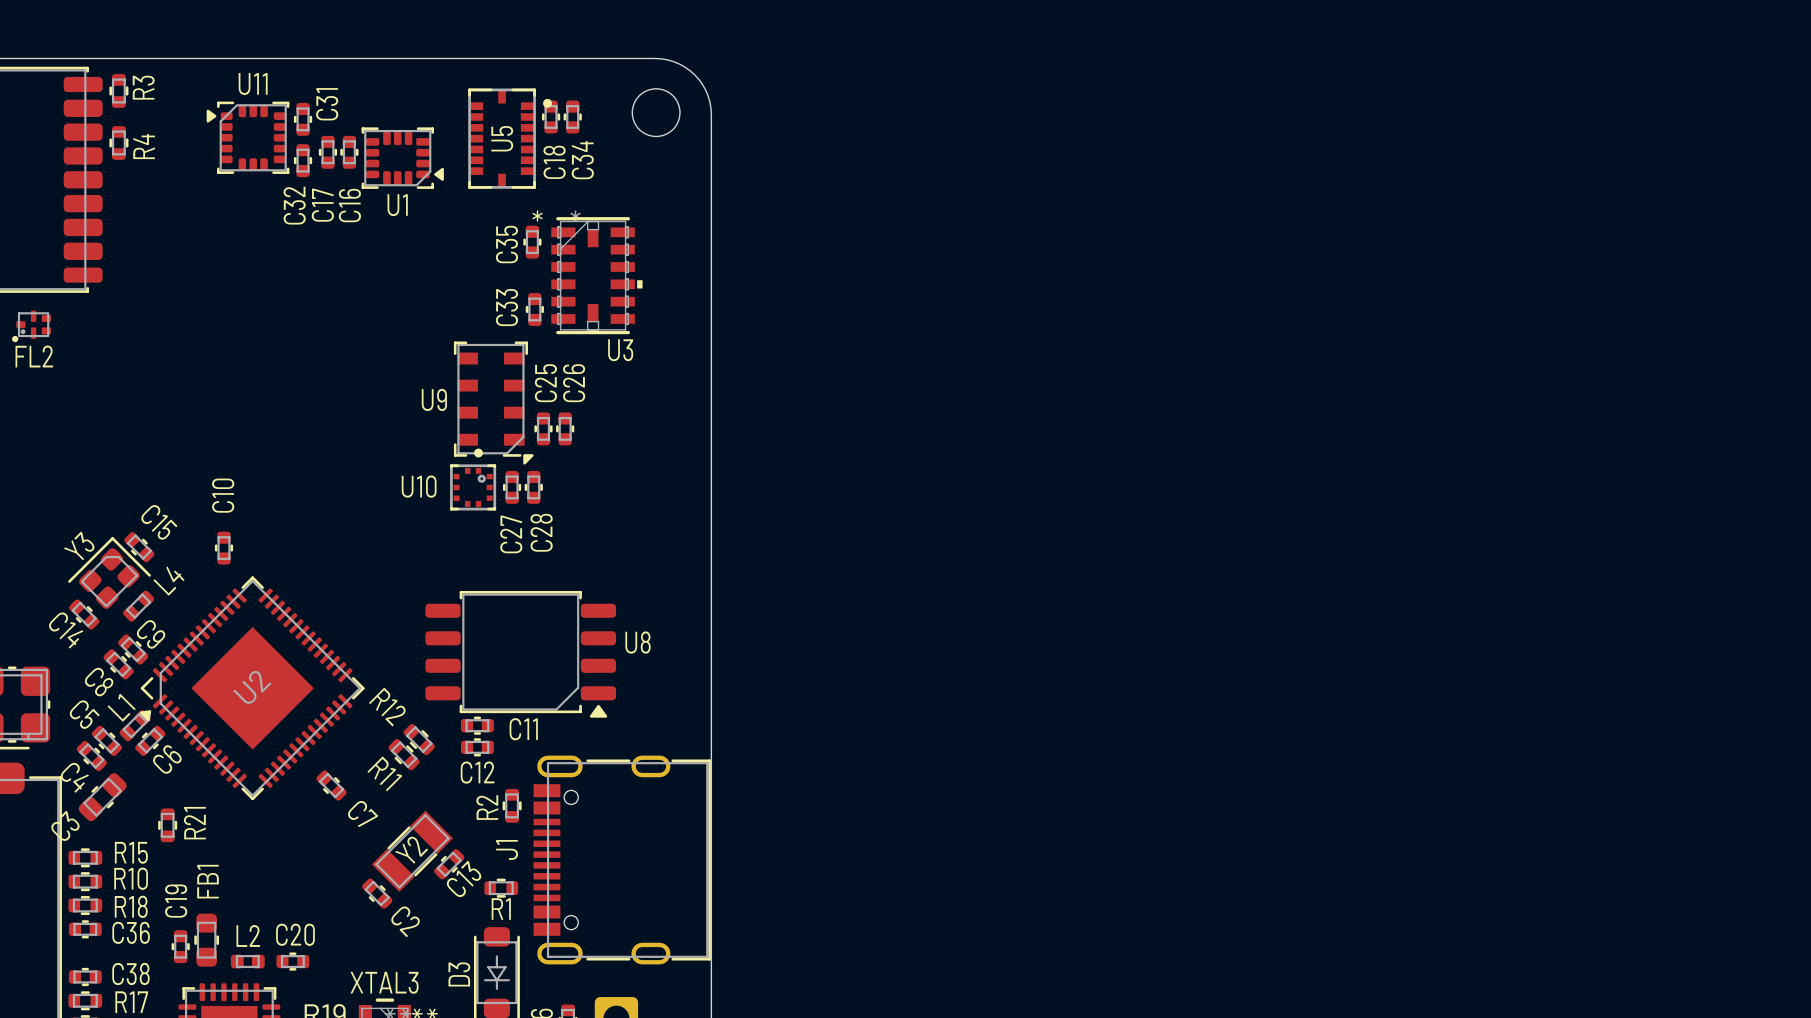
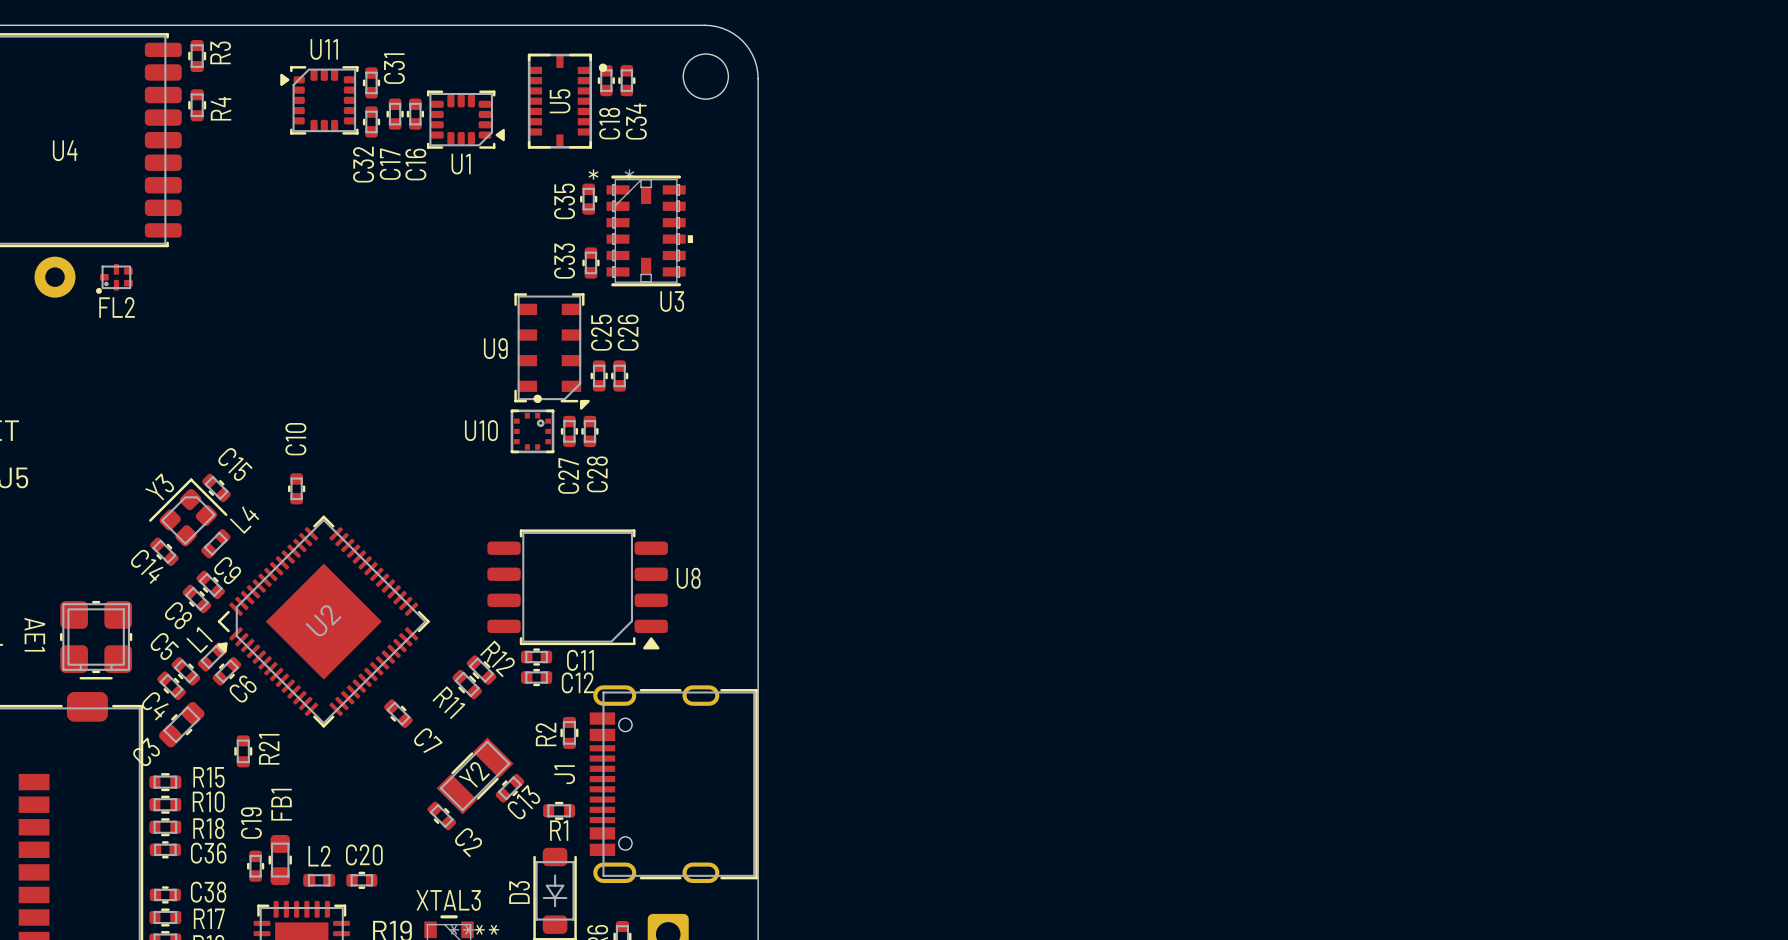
text position: R12 (387, 707) -> R12 (497, 658)
C12 name position: C12 (477, 772) -> C12 (577, 682)

